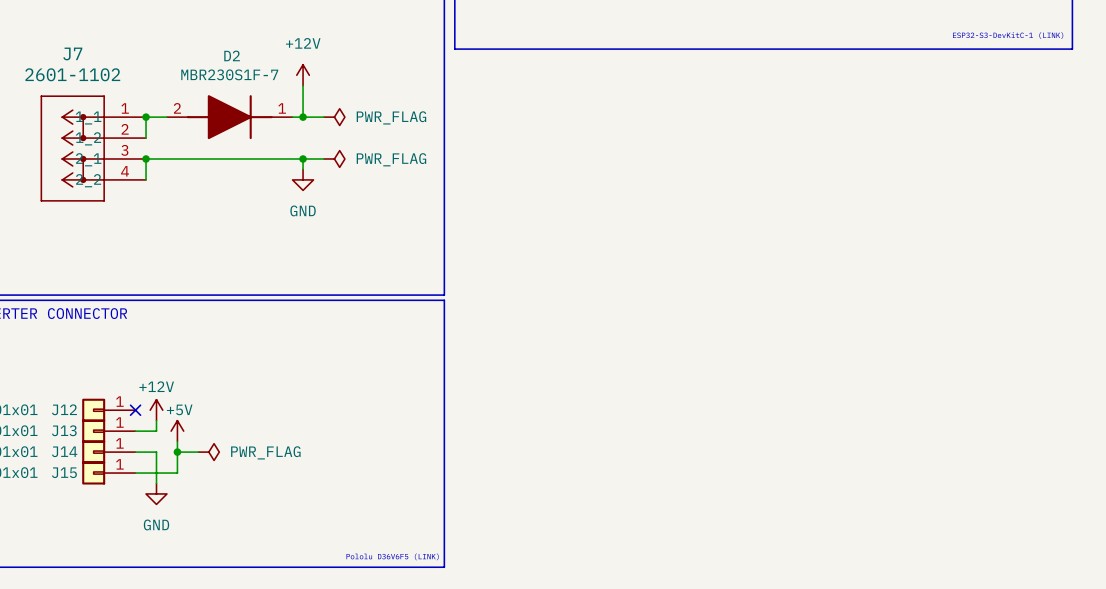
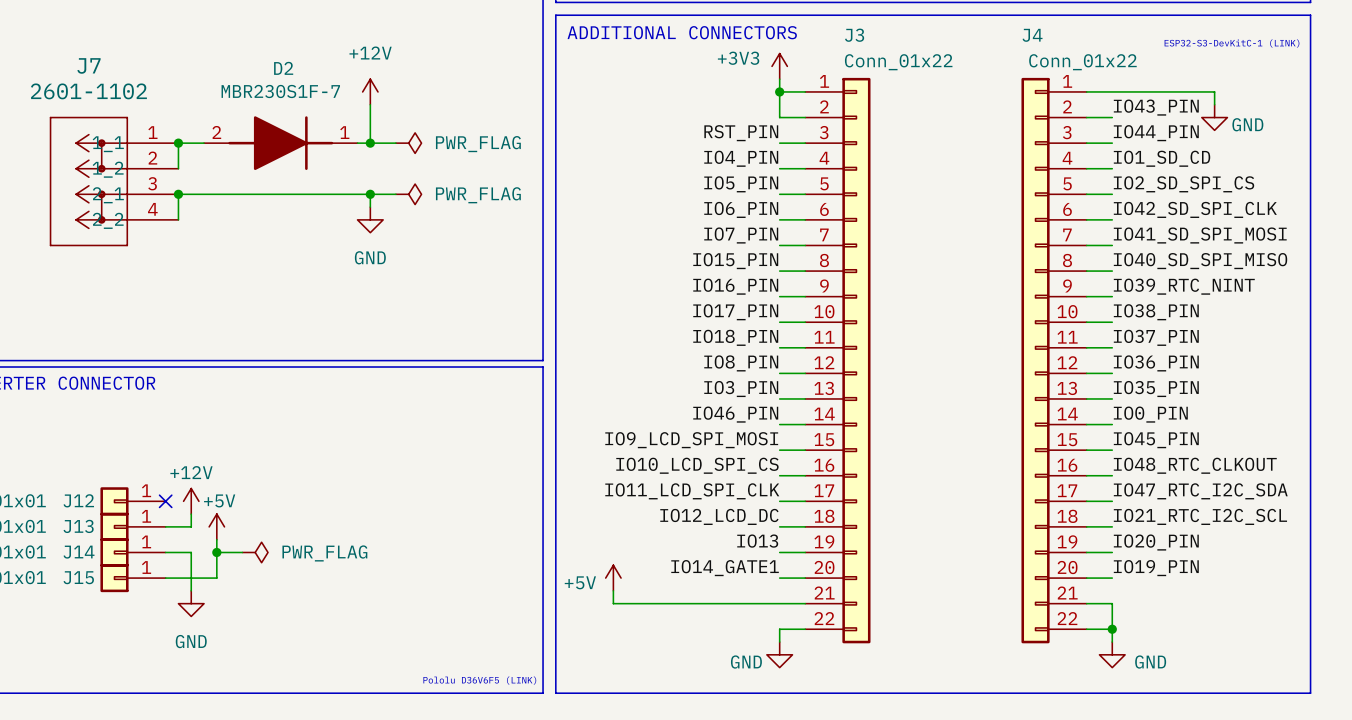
line: (454, 1) (454, 12) -> (555, 2) (1310, 2)
line: (1072, 1) (1072, 12) -> (555, 15) (1310, 15)
text: none -> ADDITIONAL CONNECTORS (682, 32)
line: (454, 49) (1072, 49) -> (555, 59) (555, 693) (1310, 693) (1310, 59)
power symbol: none -> +3V3 (779, 66)
wire: none -> (779, 79) (779, 117) (805, 117)
wire: none -> (779, 91) (805, 91)
junction: none -> (779, 91)
wire: none -> (1086, 91) (1214, 91) (1214, 104)
label: none -> IO43_PIN (1156, 107)
wire: none -> (1086, 117) (1112, 117)
power symbol: none -> GND (1214, 117)
label: none -> RST_PIN (741, 133)
label: none -> IO44_PIN (1156, 133)
wire: none -> (779, 143) (805, 143)
wire: none -> (1086, 143) (1112, 143)
label: none -> IO4_PIN (741, 158)
label: none -> IO1_SD_CD (1162, 158)
wire: none -> (779, 168) (805, 168)
wire: none -> (1086, 168) (1112, 168)
label: none -> IO5_PIN (741, 184)
label: none -> IO2_SD_SPI_CS (1183, 184)
wire: none -> (779, 194) (805, 194)
wire: none -> (1086, 194) (1112, 194)
label: none -> IO6_PIN (741, 209)
label: none -> IO42_SD_SPI_CLK (1195, 209)
wire: none -> (779, 219) (805, 219)
wire: none -> (1086, 219) (1112, 219)
label: none -> IO7_PIN (741, 235)
label: none -> IO41_SD_SPI_MOSI (1200, 235)
wire: none -> (779, 245) (805, 245)
wire: none -> (1086, 245) (1112, 245)
label: none -> IO15_PIN (735, 261)
label: none -> IO40_SD_SPI_MISO (1200, 261)
wire: none -> (779, 271) (805, 271)
wire: none -> (1086, 271) (1112, 271)
label: none -> IO16_PIN (735, 286)
label: none -> IO39_RTC_NINT (1184, 286)
wire: none -> (779, 296) (805, 296)
wire: none -> (1086, 296) (1112, 296)
label: none -> IO17_PIN (735, 312)
label: none -> IO38_PIN (1156, 312)
wire: none -> (779, 322) (805, 322)
wire: none -> (1086, 322) (1112, 322)
label: none -> IO18_PIN (735, 337)
label: none -> IO37_PIN (1156, 337)
wire: none -> (779, 347) (805, 347)
wire: none -> (1086, 347) (1112, 347)
J3: none -> Conn_01x22 (837, 360)
J4: none -> Conn_01x22 (1054, 360)
label: none -> IO8_PIN (741, 363)
label: none -> IO36_PIN (1156, 363)
wire: none -> (779, 373) (805, 373)
wire: none -> (1086, 373) (1112, 373)
label: none -> IO3_PIN (741, 389)
label: none -> IO35_PIN (1156, 389)
wire: none -> (779, 398) (805, 398)
wire: none -> (1086, 398) (1112, 398)
label: none -> IO46_PIN (735, 414)
label: none -> IO0_PIN (1150, 414)
wire: none -> (779, 424) (805, 424)
wire: none -> (1086, 424) (1112, 424)
label: none -> IO9_LCD_SPI_MOSI (691, 440)
label: none -> IO45_PIN (1156, 440)
wire: none -> (779, 450) (805, 450)
wire: none -> (1086, 450) (1112, 450)
label: none -> IO10_LCD_SPI_CS (697, 465)
label: none -> IO48_RTC_CLKOUT (1195, 465)
wire: none -> (779, 475) (805, 475)
wire: none -> (1086, 475) (1112, 475)
label: none -> IO11_LCD_SPI_CLK (692, 491)
label: none -> IO47_RTC_I2C_SDA (1200, 491)
wire: none -> (779, 501) (805, 501)
wire: none -> (1086, 501) (1112, 501)
label: none -> IO12_LCD_DC (719, 516)
label: none -> IO21_RTC_I2C_SCL (1200, 516)
wire: none -> (779, 526) (805, 526)
wire: none -> (1086, 526) (1112, 526)
label: none -> IO13 (757, 541)
label: none -> IO20_PIN (1156, 542)
wire: none -> (779, 552) (805, 552)
wire: none -> (1086, 552) (1112, 552)
label: none -> IO14_GATE1 (725, 568)
label: none -> IO19_PIN (1156, 568)
power symbol: none -> +5V (613, 578)
wire: none -> (779, 578) (805, 578)
wire: none -> (1086, 578) (1112, 578)
wire: none -> (613, 590) (613, 603) (805, 603)
wire: none -> (1086, 603) (1112, 603) (1112, 642)
wire: none -> (805, 629) (779, 629) (779, 642)
wire: none -> (1086, 629) (1112, 629)
junction: none -> (1112, 629)
power symbol: none -> GND (779, 654)
power symbol: none -> GND (1112, 654)

